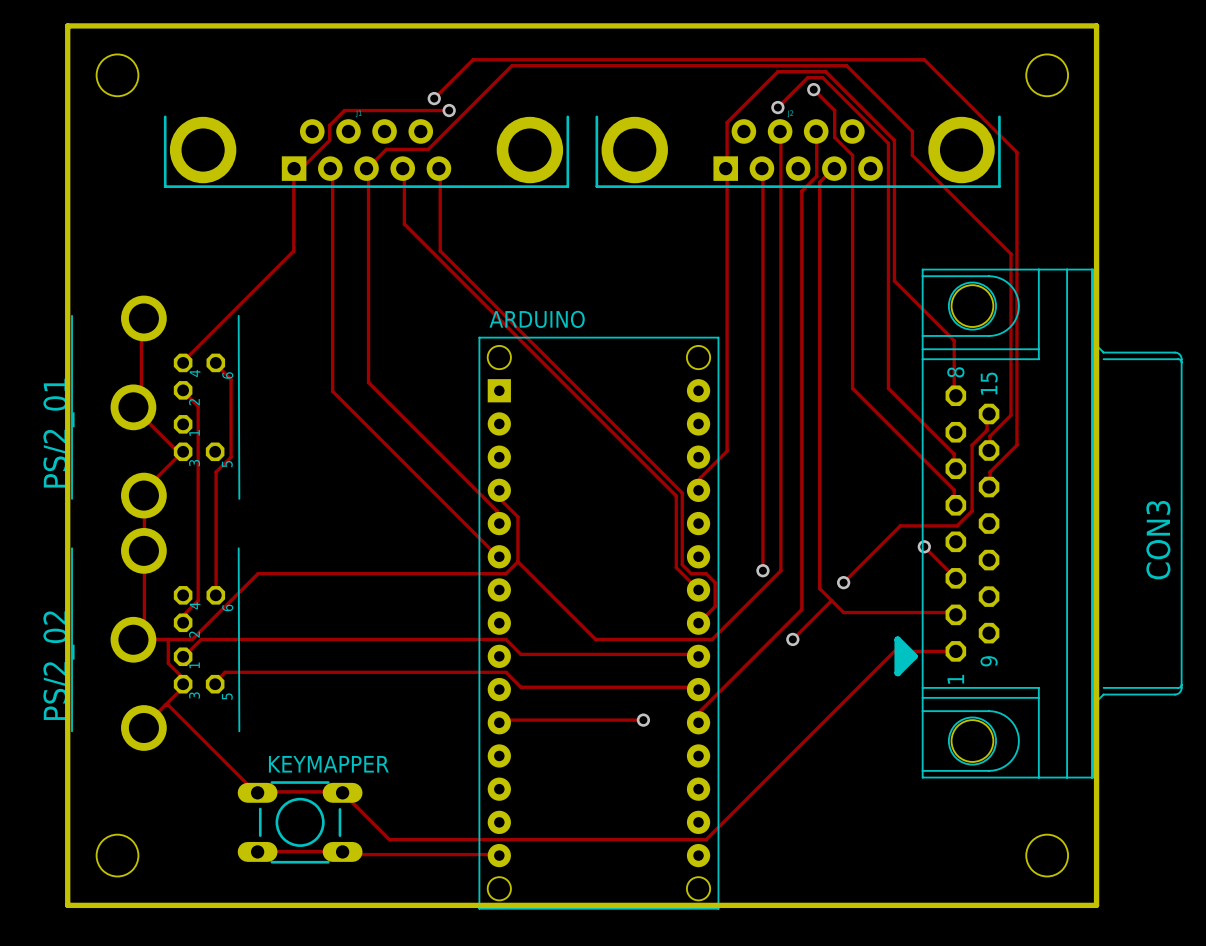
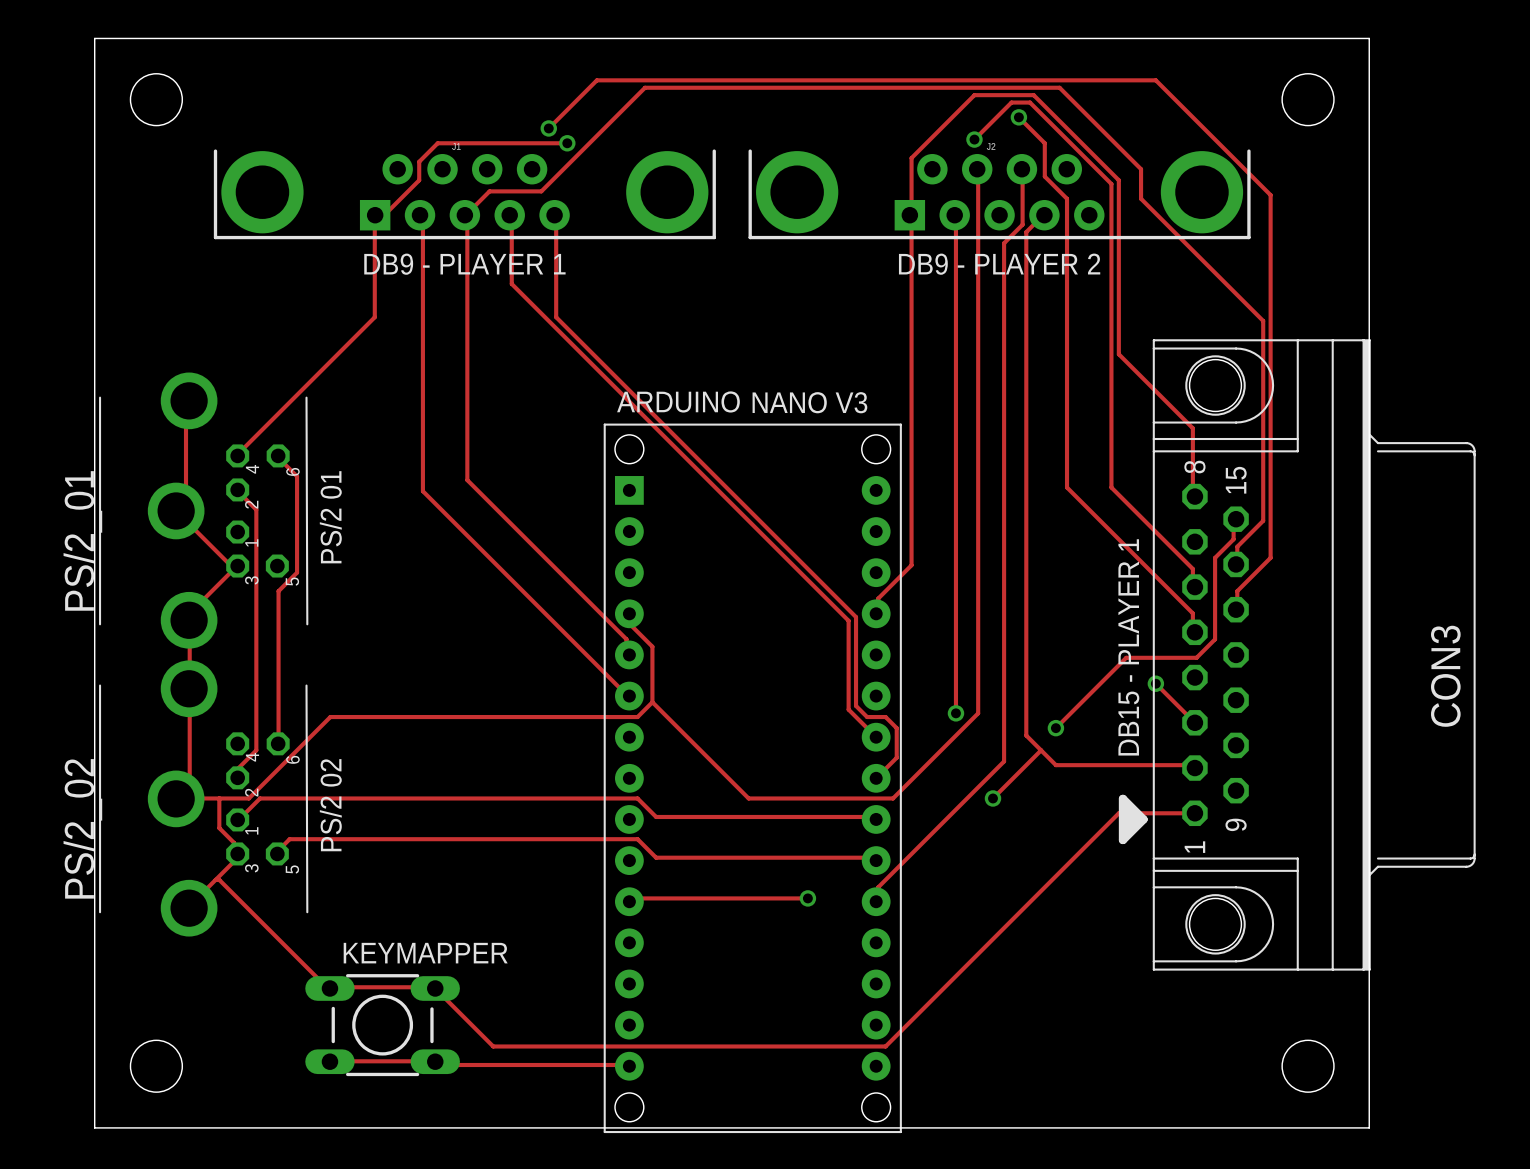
board edge width: thick (67, 25) (1096, 25) (1096, 905) (67, 905) (67, 25) -> thin (94, 38) (1369, 38) (1369, 1127) (94, 1127) (94, 38)
text: none -> DB9 - PLAYER 1 (464, 264)
text: none -> DB9 - PLAYER 2 (999, 264)
text: none -> NANO V3 (809, 402)
text: none -> PS/2 01 (330, 517)
text: none -> DB15 - PLAYER 1 (1128, 647)
text: none -> PS/2 02 (330, 805)

